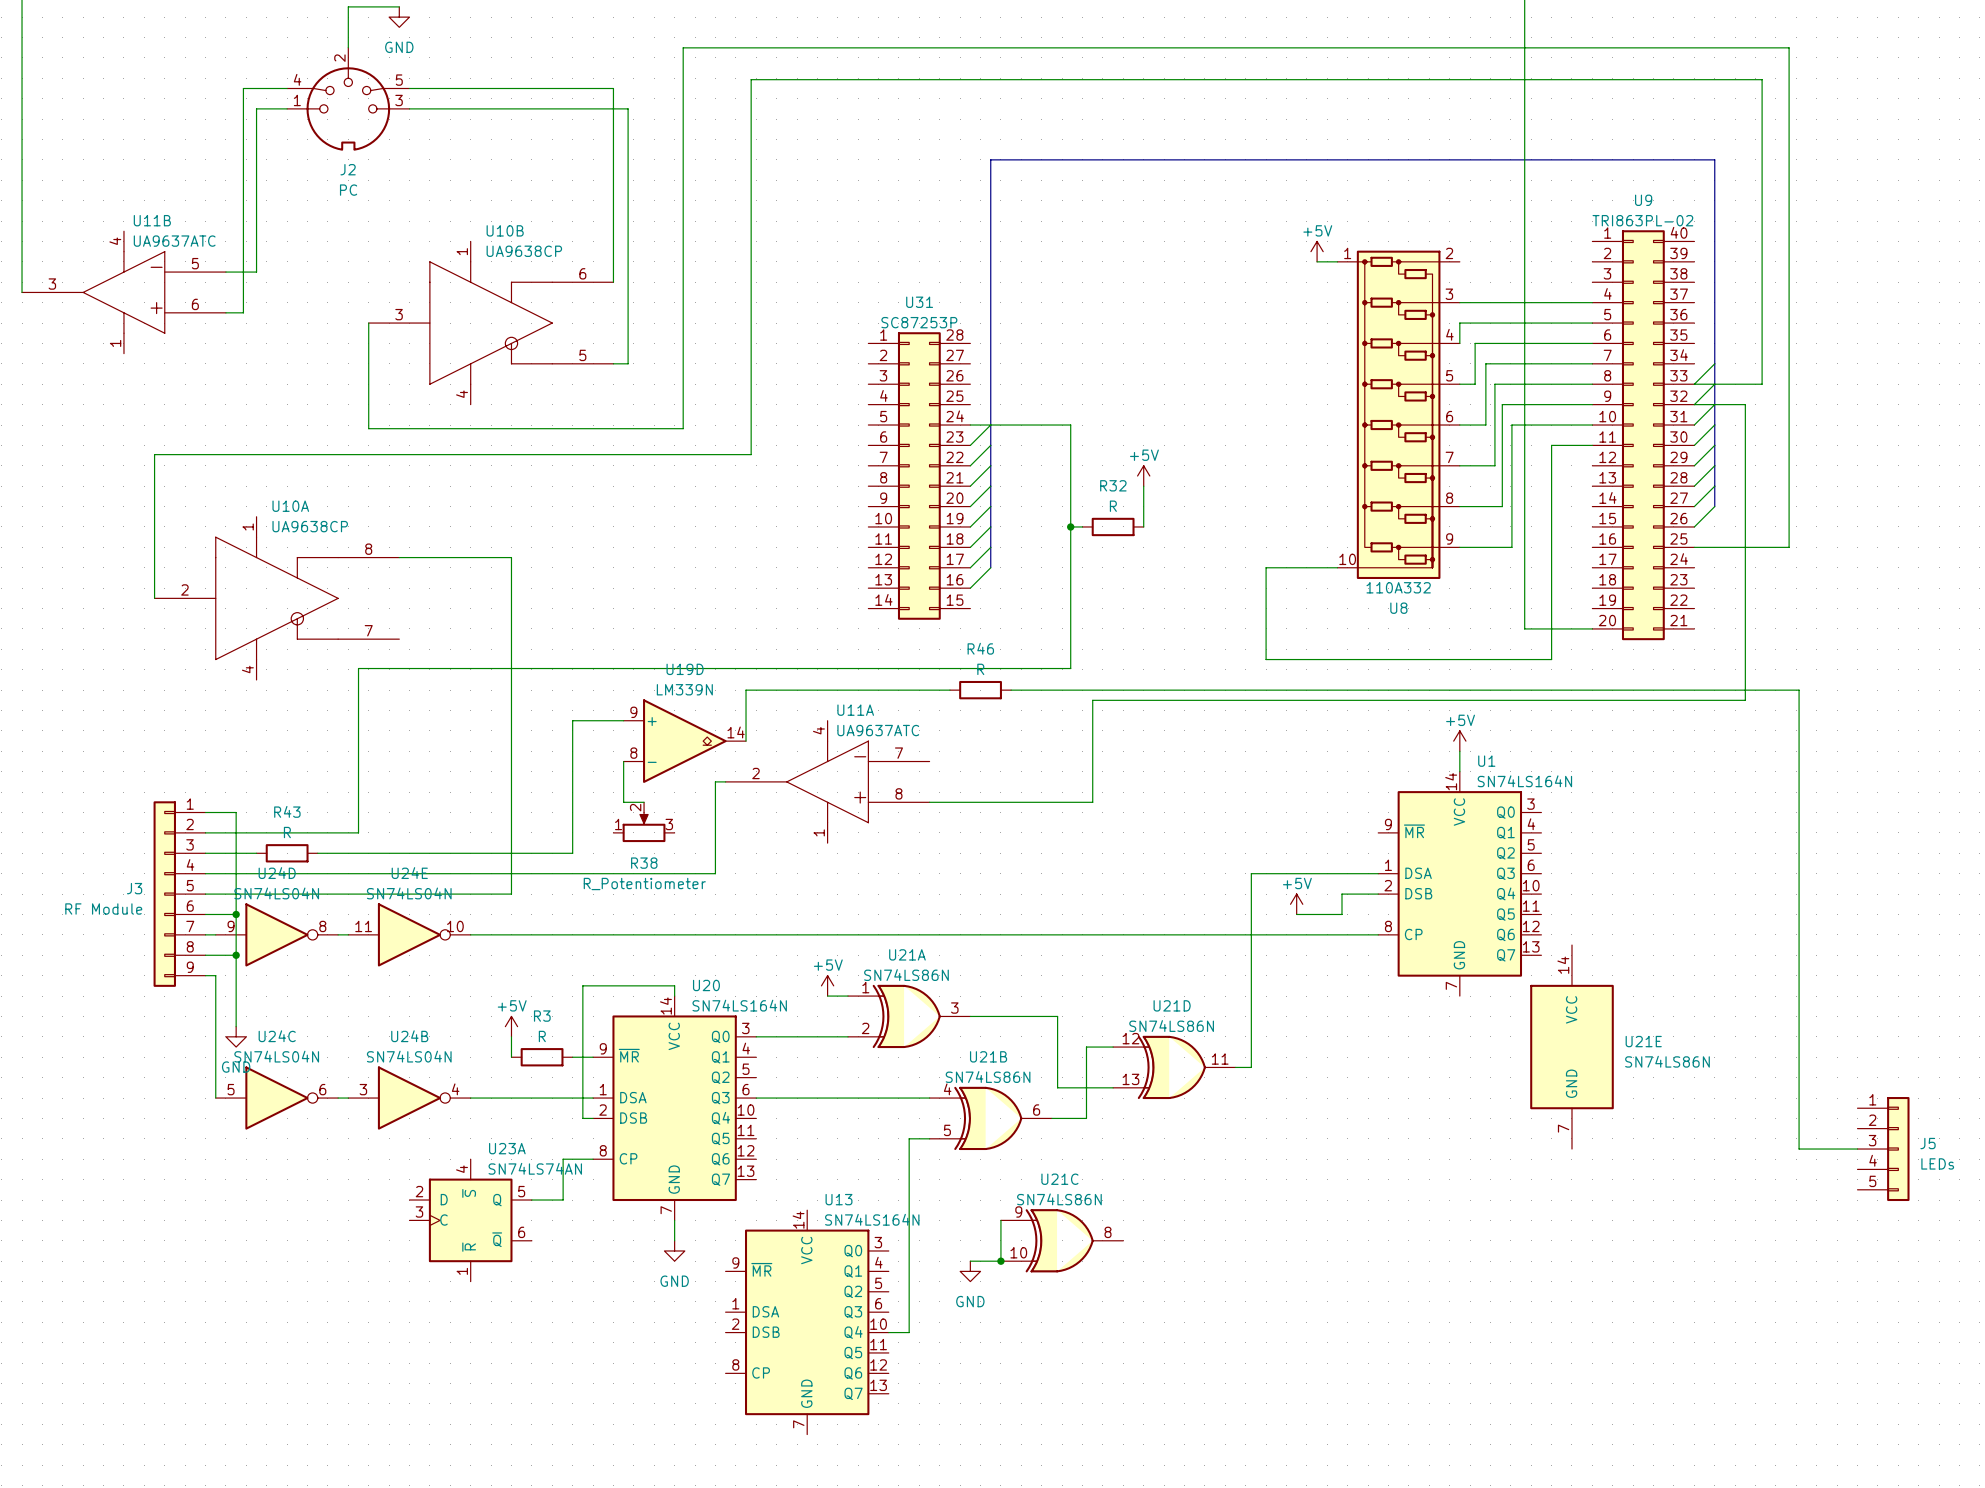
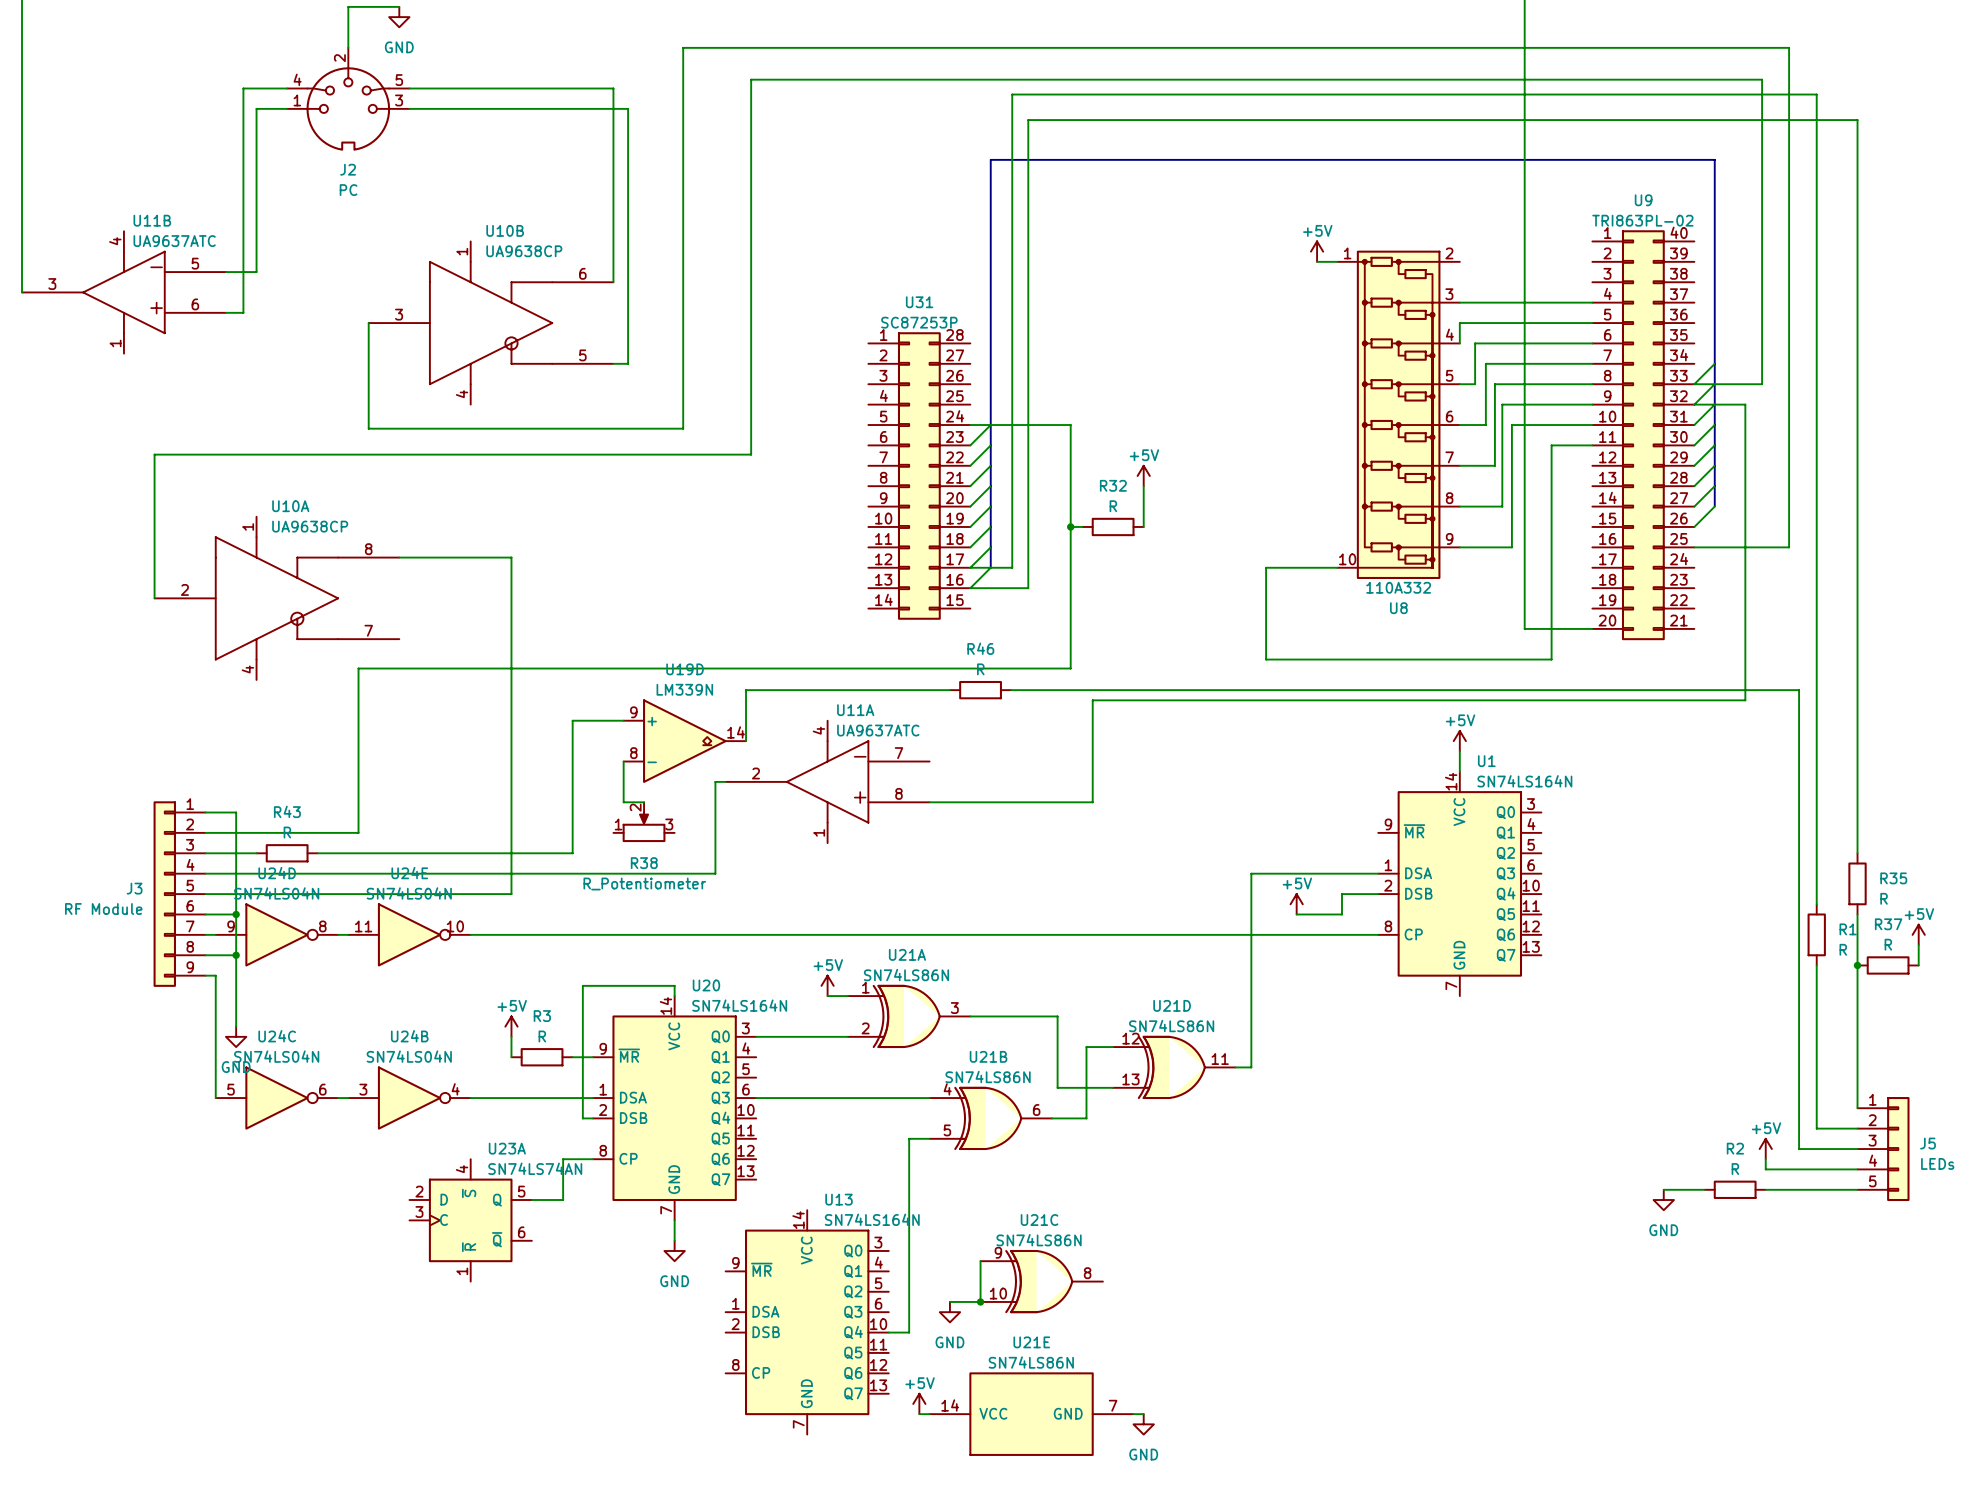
wire: none -> (970, 567) (1012, 567) (1012, 94) (1816, 94) (1816, 904)
wire: none -> (970, 588) (1028, 588) (1028, 120) (1857, 120) (1857, 853)
R35: none -> R (1857, 883)
wire: none -> (1857, 914) (1857, 1108)
R1: none -> R (1816, 934)
power symbol: none -> +5V (1918, 934)
wire: none -> (1918, 945) (1918, 965)
wire: none -> (1816, 965) (1816, 1128) (1857, 1128)
junction: none -> (1857, 965)
R37: none -> R (1888, 965)
U21E rotation: 0° (1571, 1047) -> 90° counterclockwise (1031, 1414)
U21E position: (1571, 1047) -> (1031, 1414)
U21E value position: SN74LS86N (1667, 1061) -> SN74LS86N (1031, 1362)
power symbol: none -> +5V (1765, 1149)
wire: none -> (1765, 1159) (1765, 1169) (1857, 1169)
wire: none -> (1663, 1189) (1704, 1189)
R2: none -> R (1735, 1189)
wire: none -> (1765, 1189) (1857, 1189)
power symbol: none -> GND (1663, 1200)
wire: (1000, 1220) (1000, 1261) (970, 1261) -> (980, 1261) (980, 1301) (949, 1301)
U21C position: (1062, 1240) -> (1041, 1281)
junction position: (1000, 1261) -> (980, 1301)
power symbol position: GND (970, 1271) -> GND (949, 1312)
power symbol: none -> +5V (919, 1403)
wire: none -> (919, 1414) (929, 1414)
wire: none -> (1133, 1414) (1143, 1414)
power symbol: none -> GND (1143, 1424)

